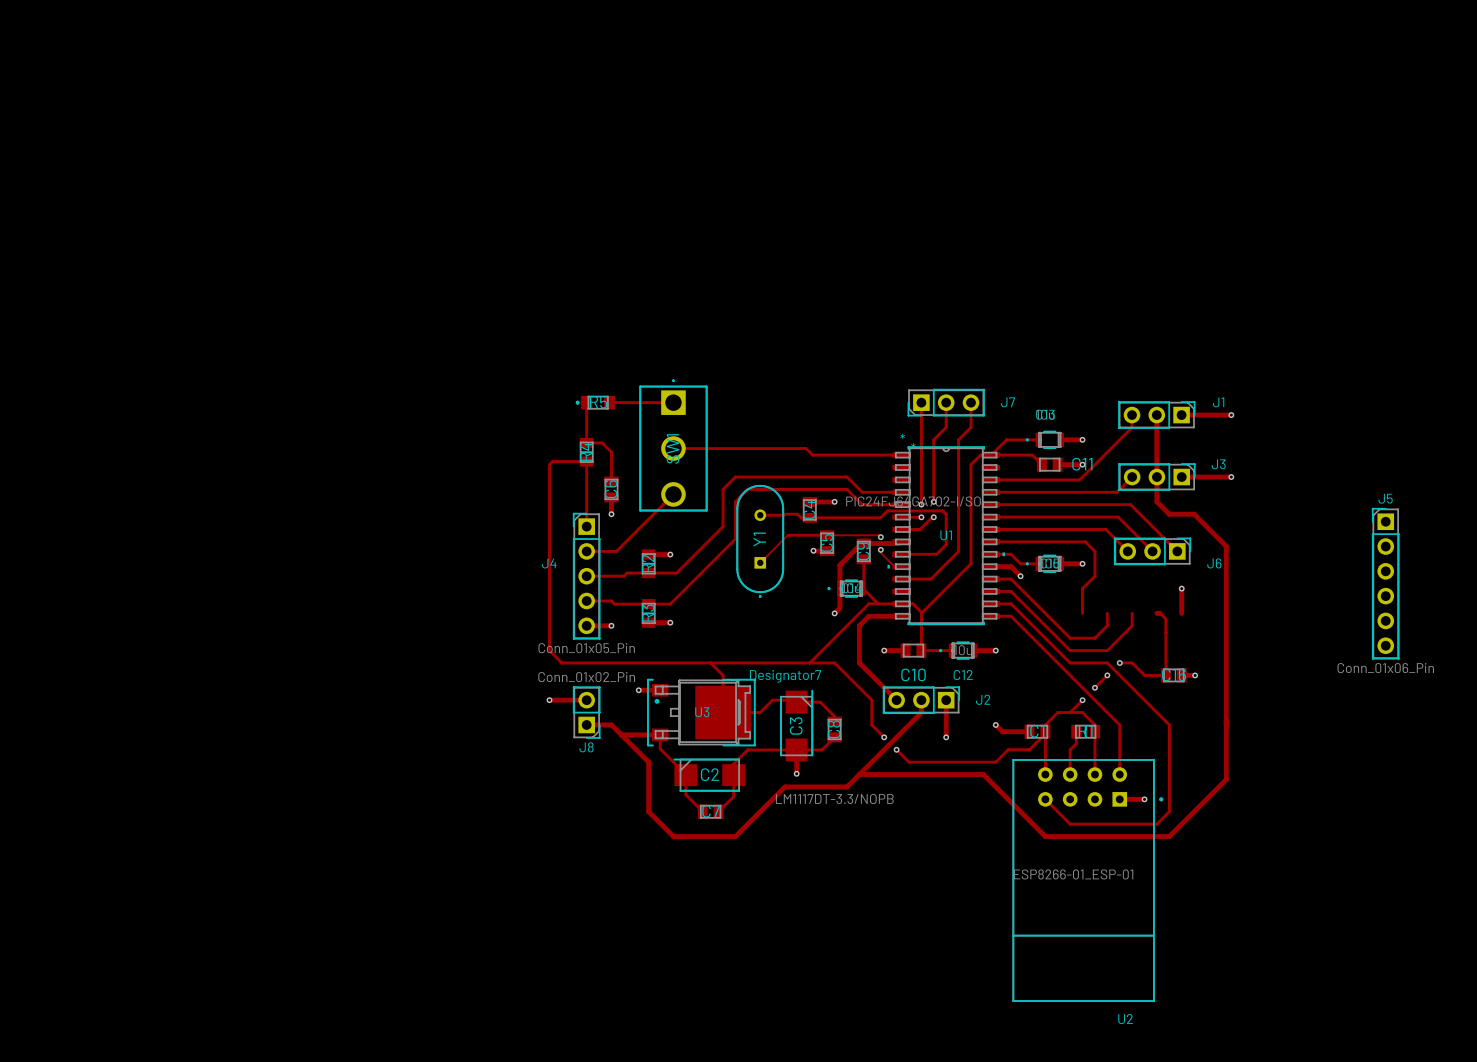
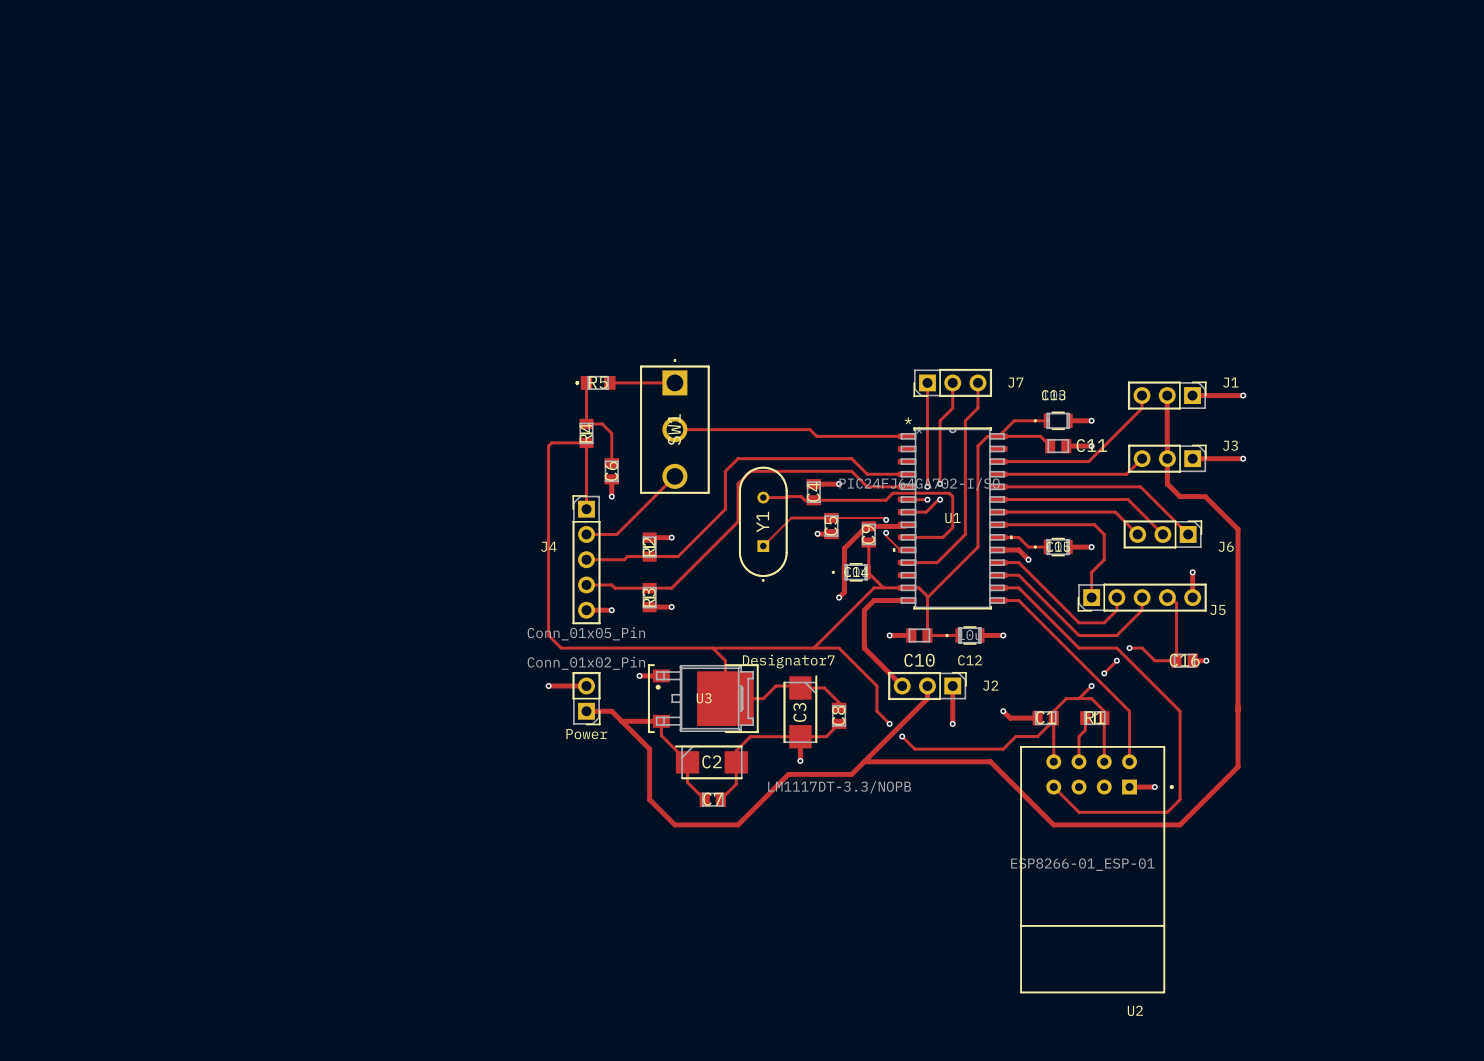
J5 name position: J5 (1385, 498) -> J5 (1217, 609)
J5 footprint: [1372, 508, 1400, 660] -> [1077, 583, 1207, 612]
J5 value: Conn_01x06_Pin (1385, 668) -> none
J8 name: J8 (586, 747) -> Power (586, 734)

